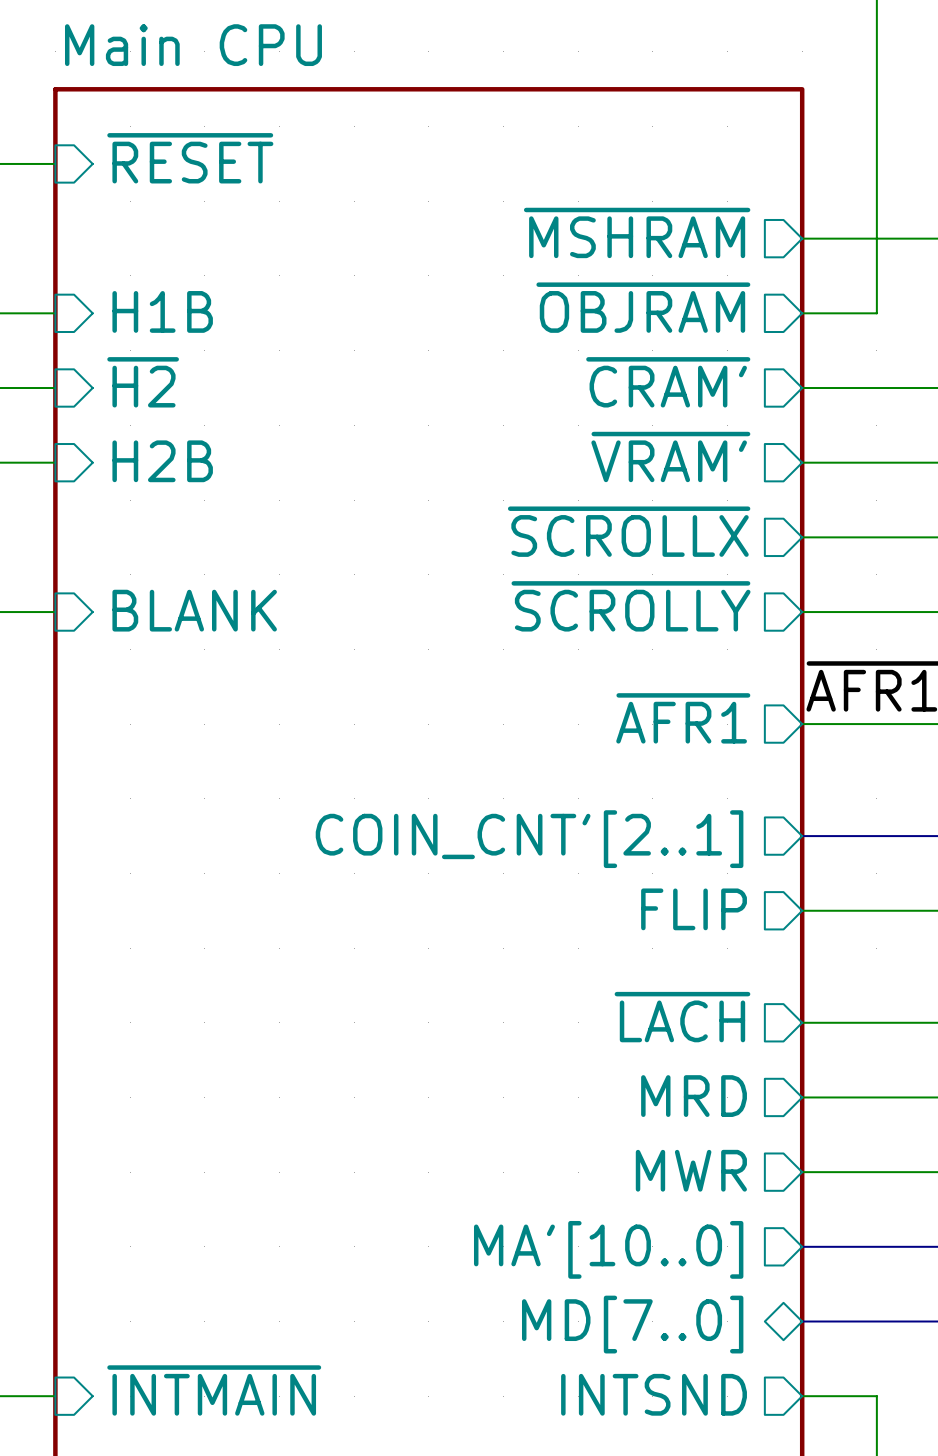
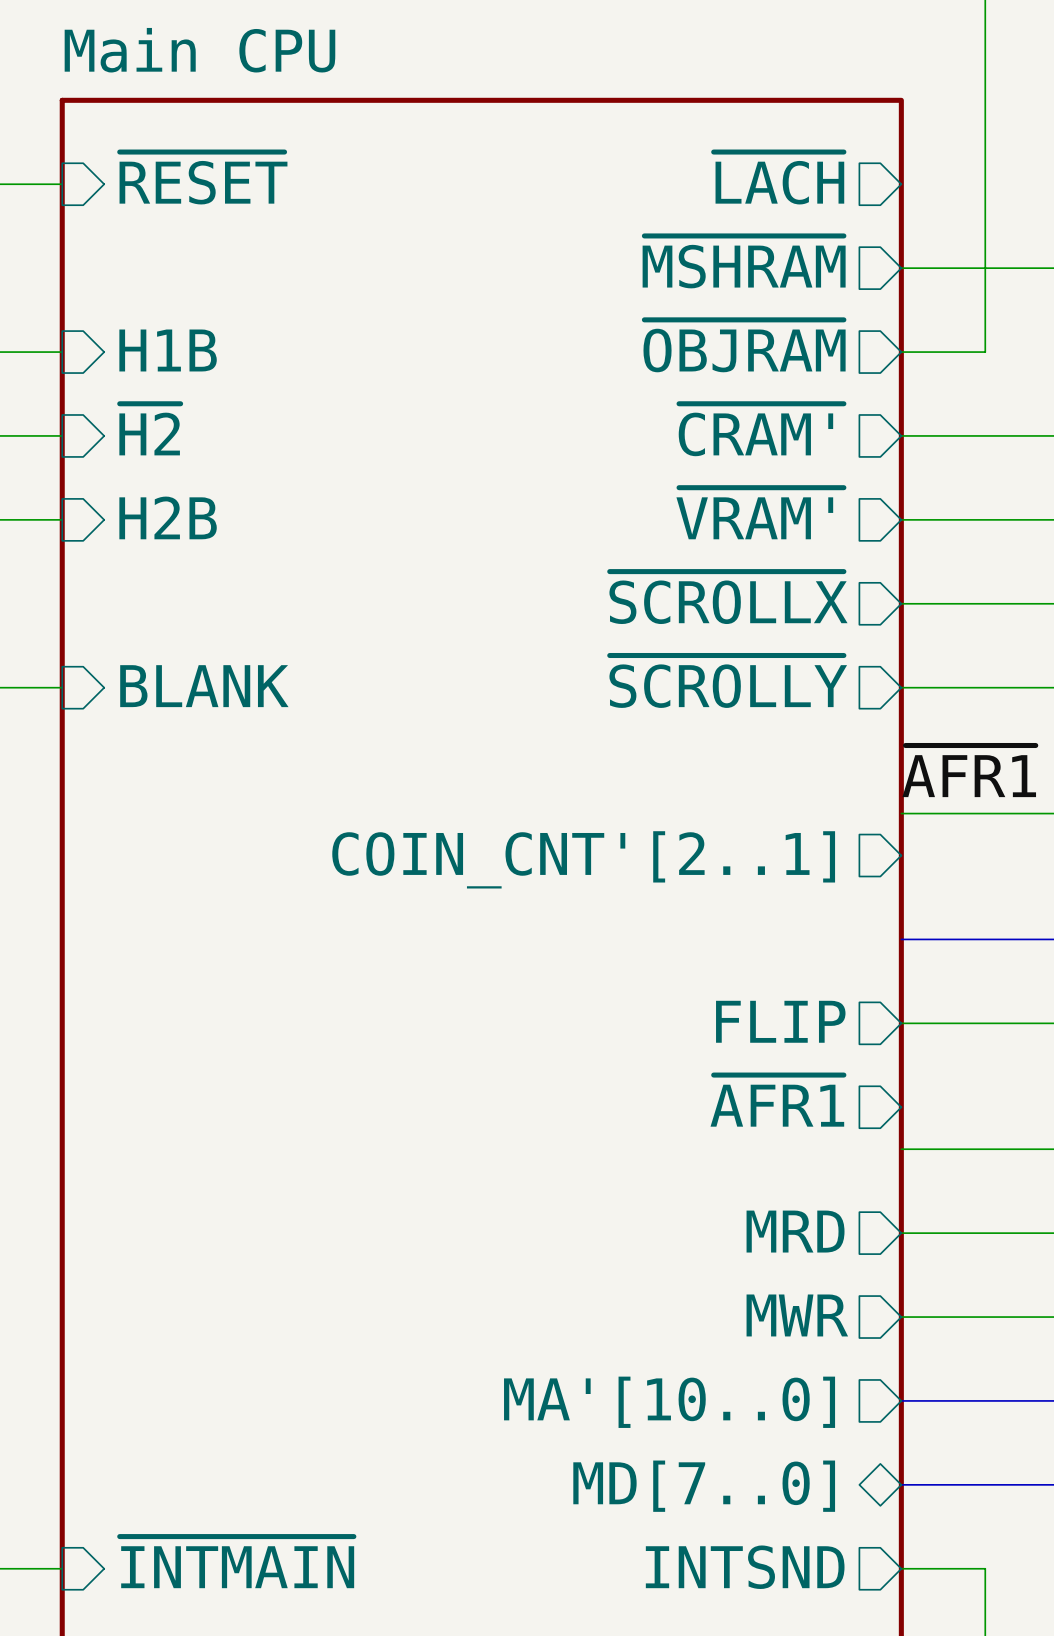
sheet pin: none -> ~{LACH} (778, 178)
sheet pin position: ~{AFR1} (683, 718) -> ~{AFR1} (777, 1100)
sheet pin position: COIN_CNT'[2..1] (529, 839) -> COIN_CNT'[2..1] (583, 859)
sheet pin: ~{LACH} (682, 1017) -> none

